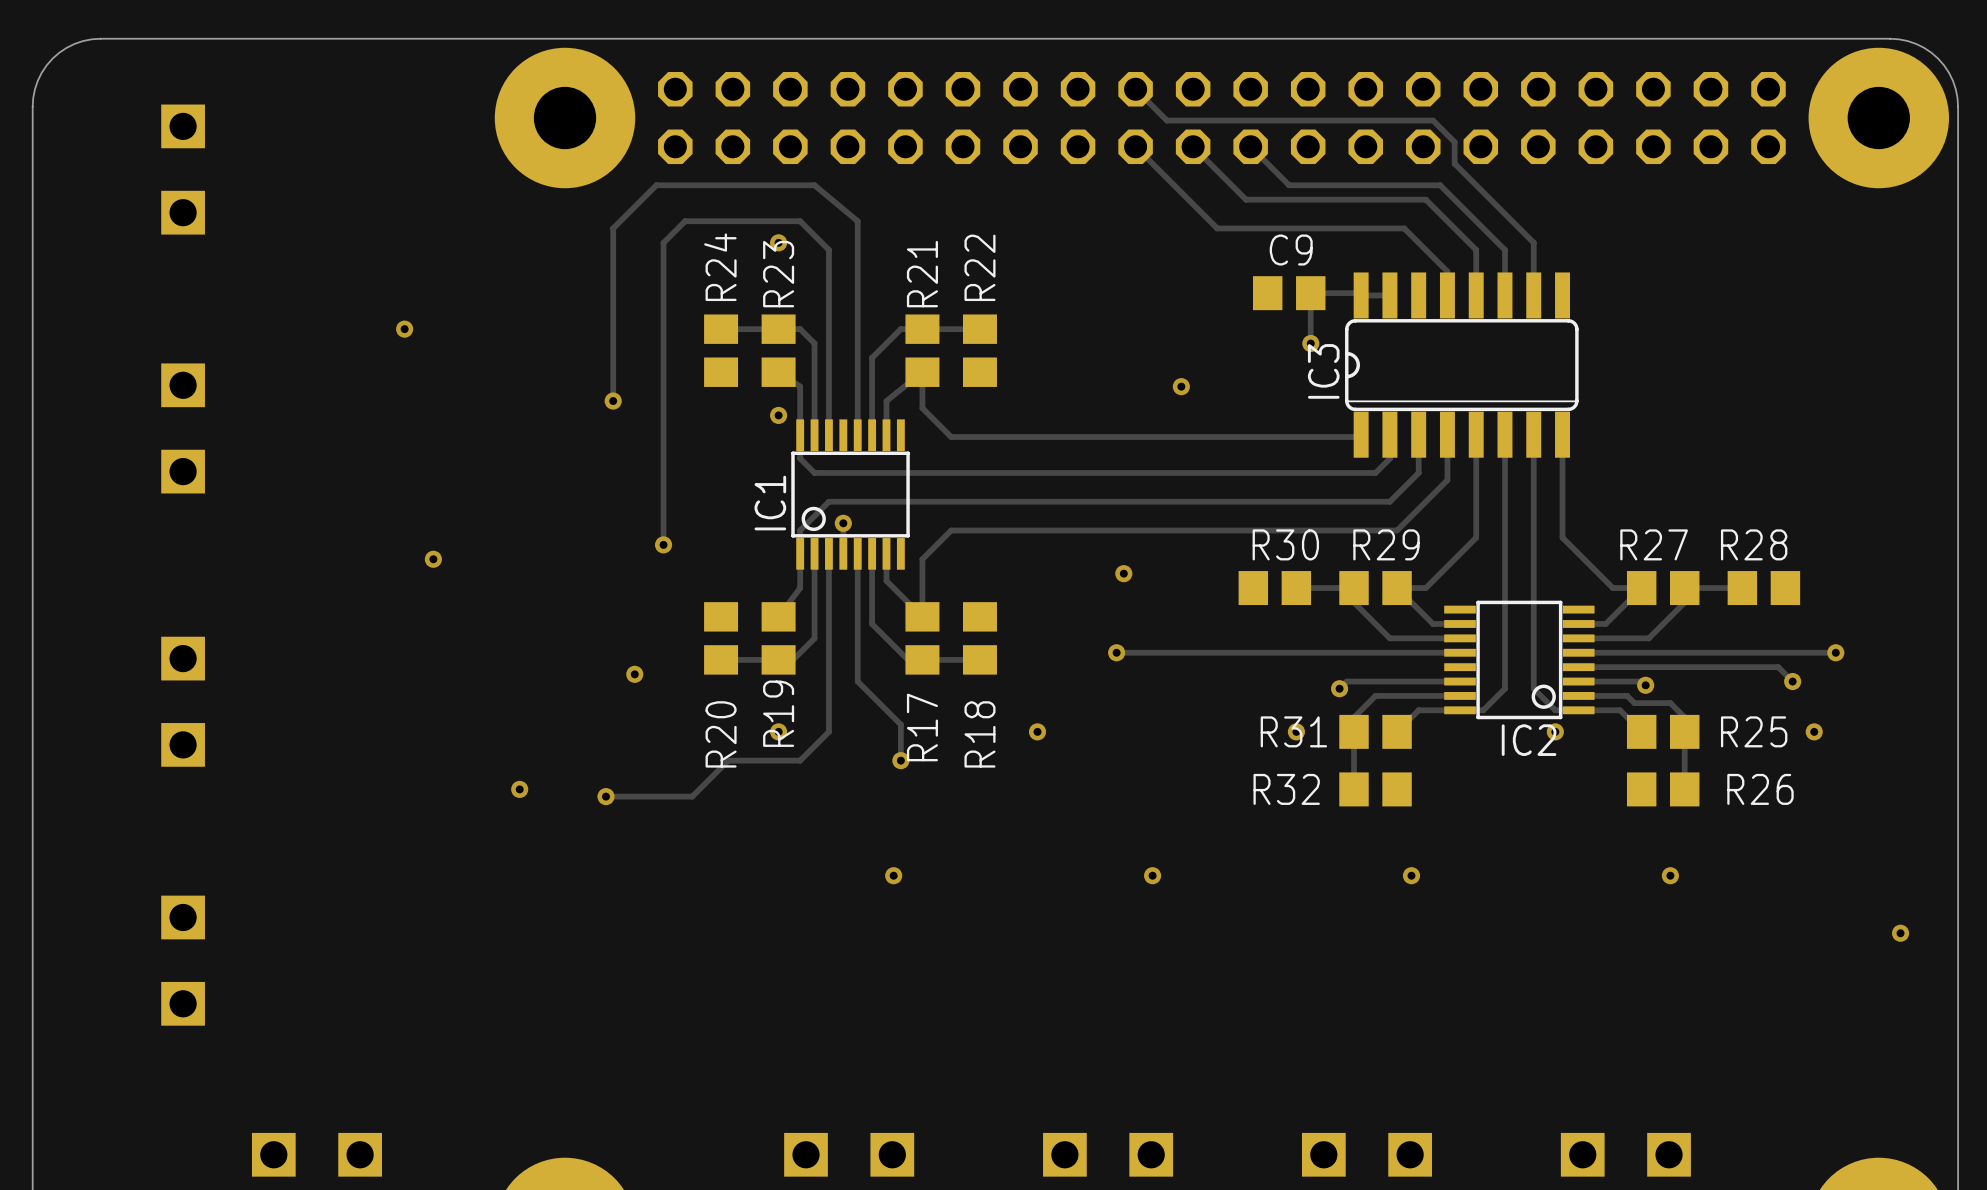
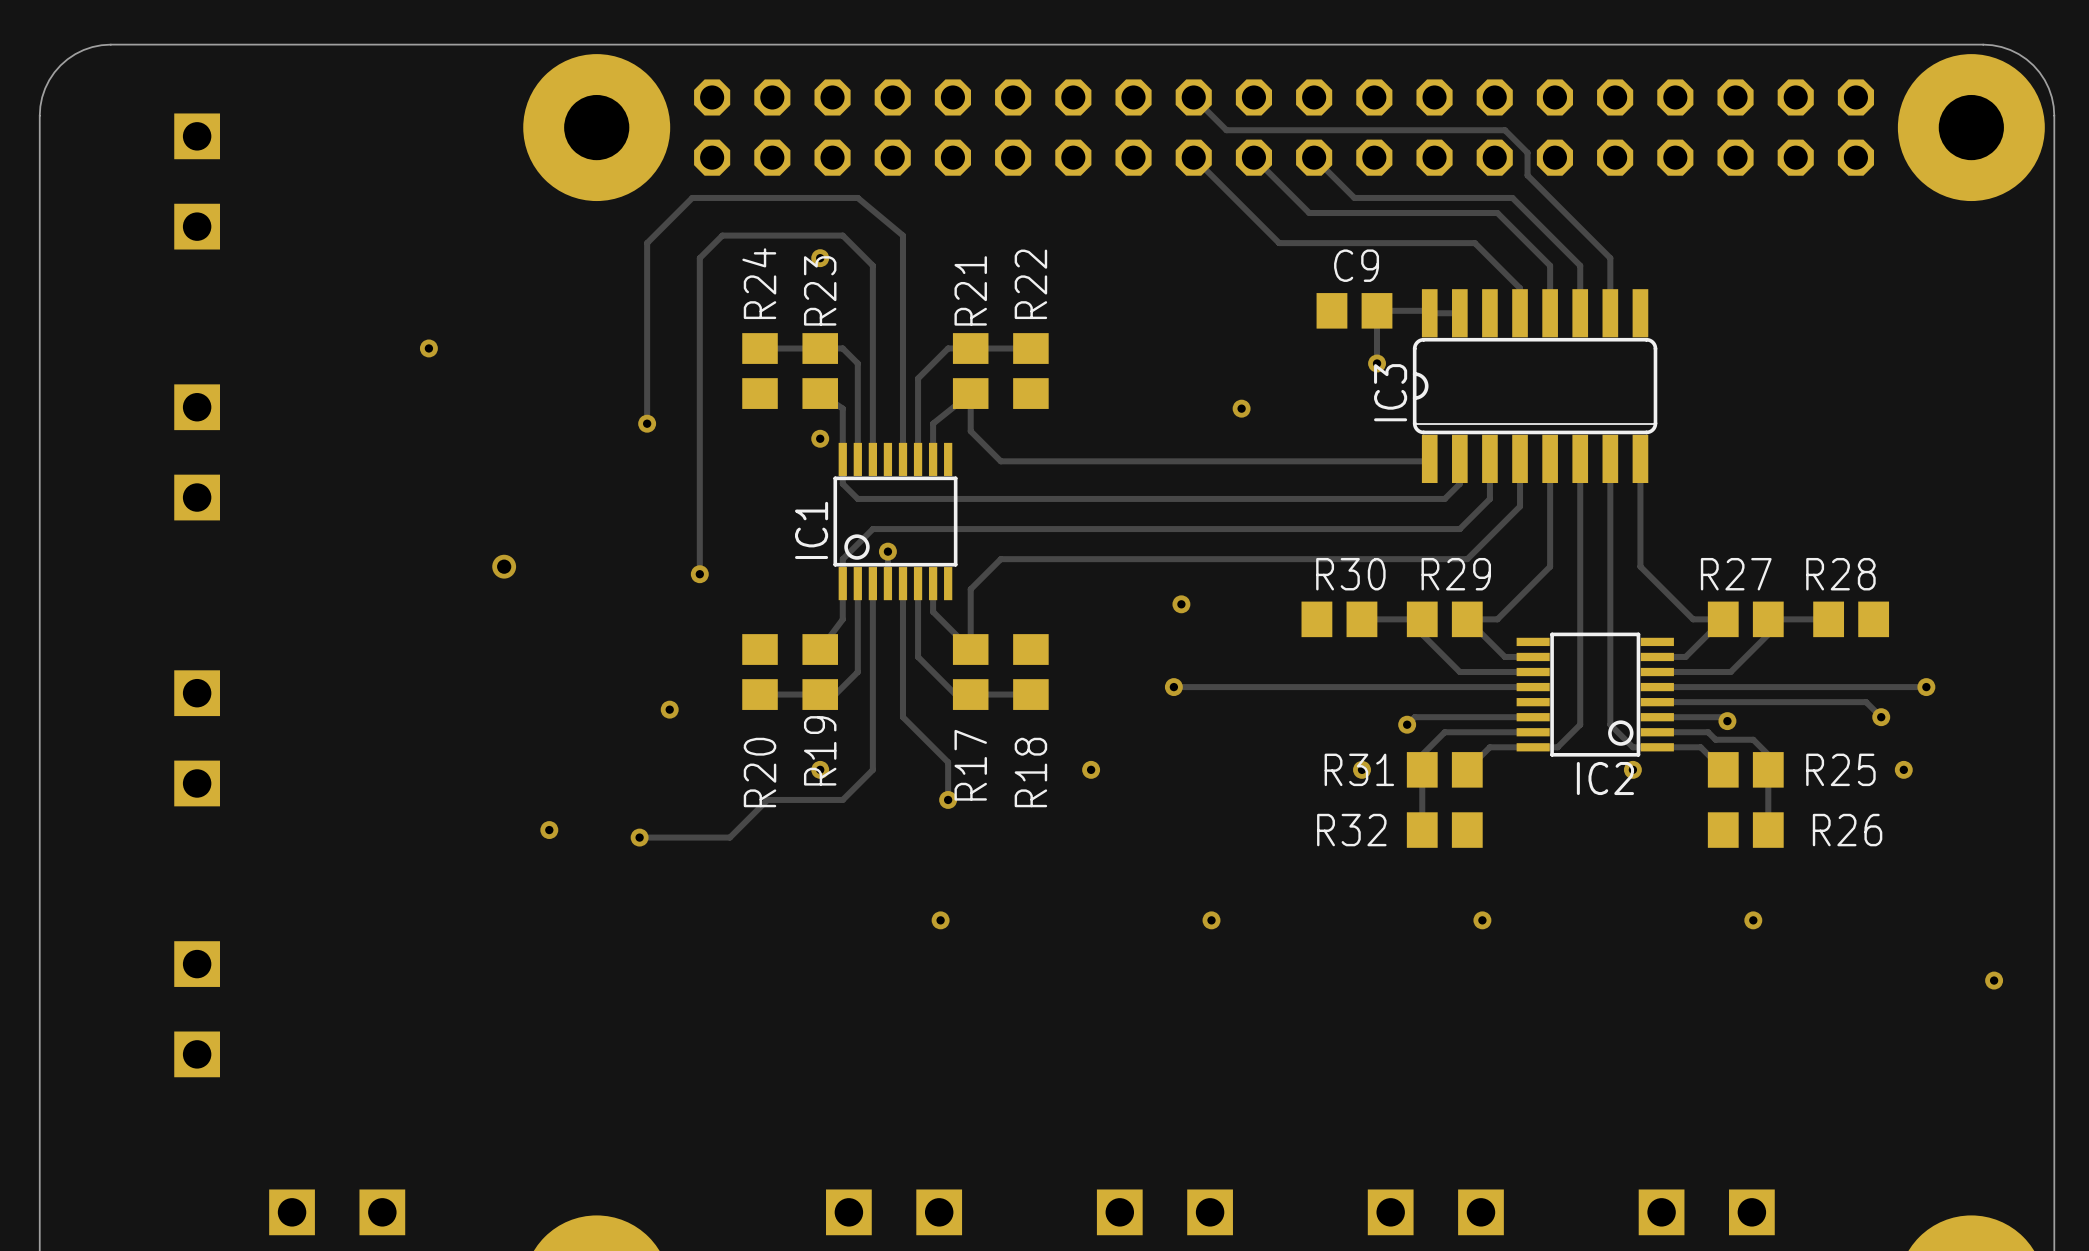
via: none -> (504, 566)
via: (433, 559) -> none

